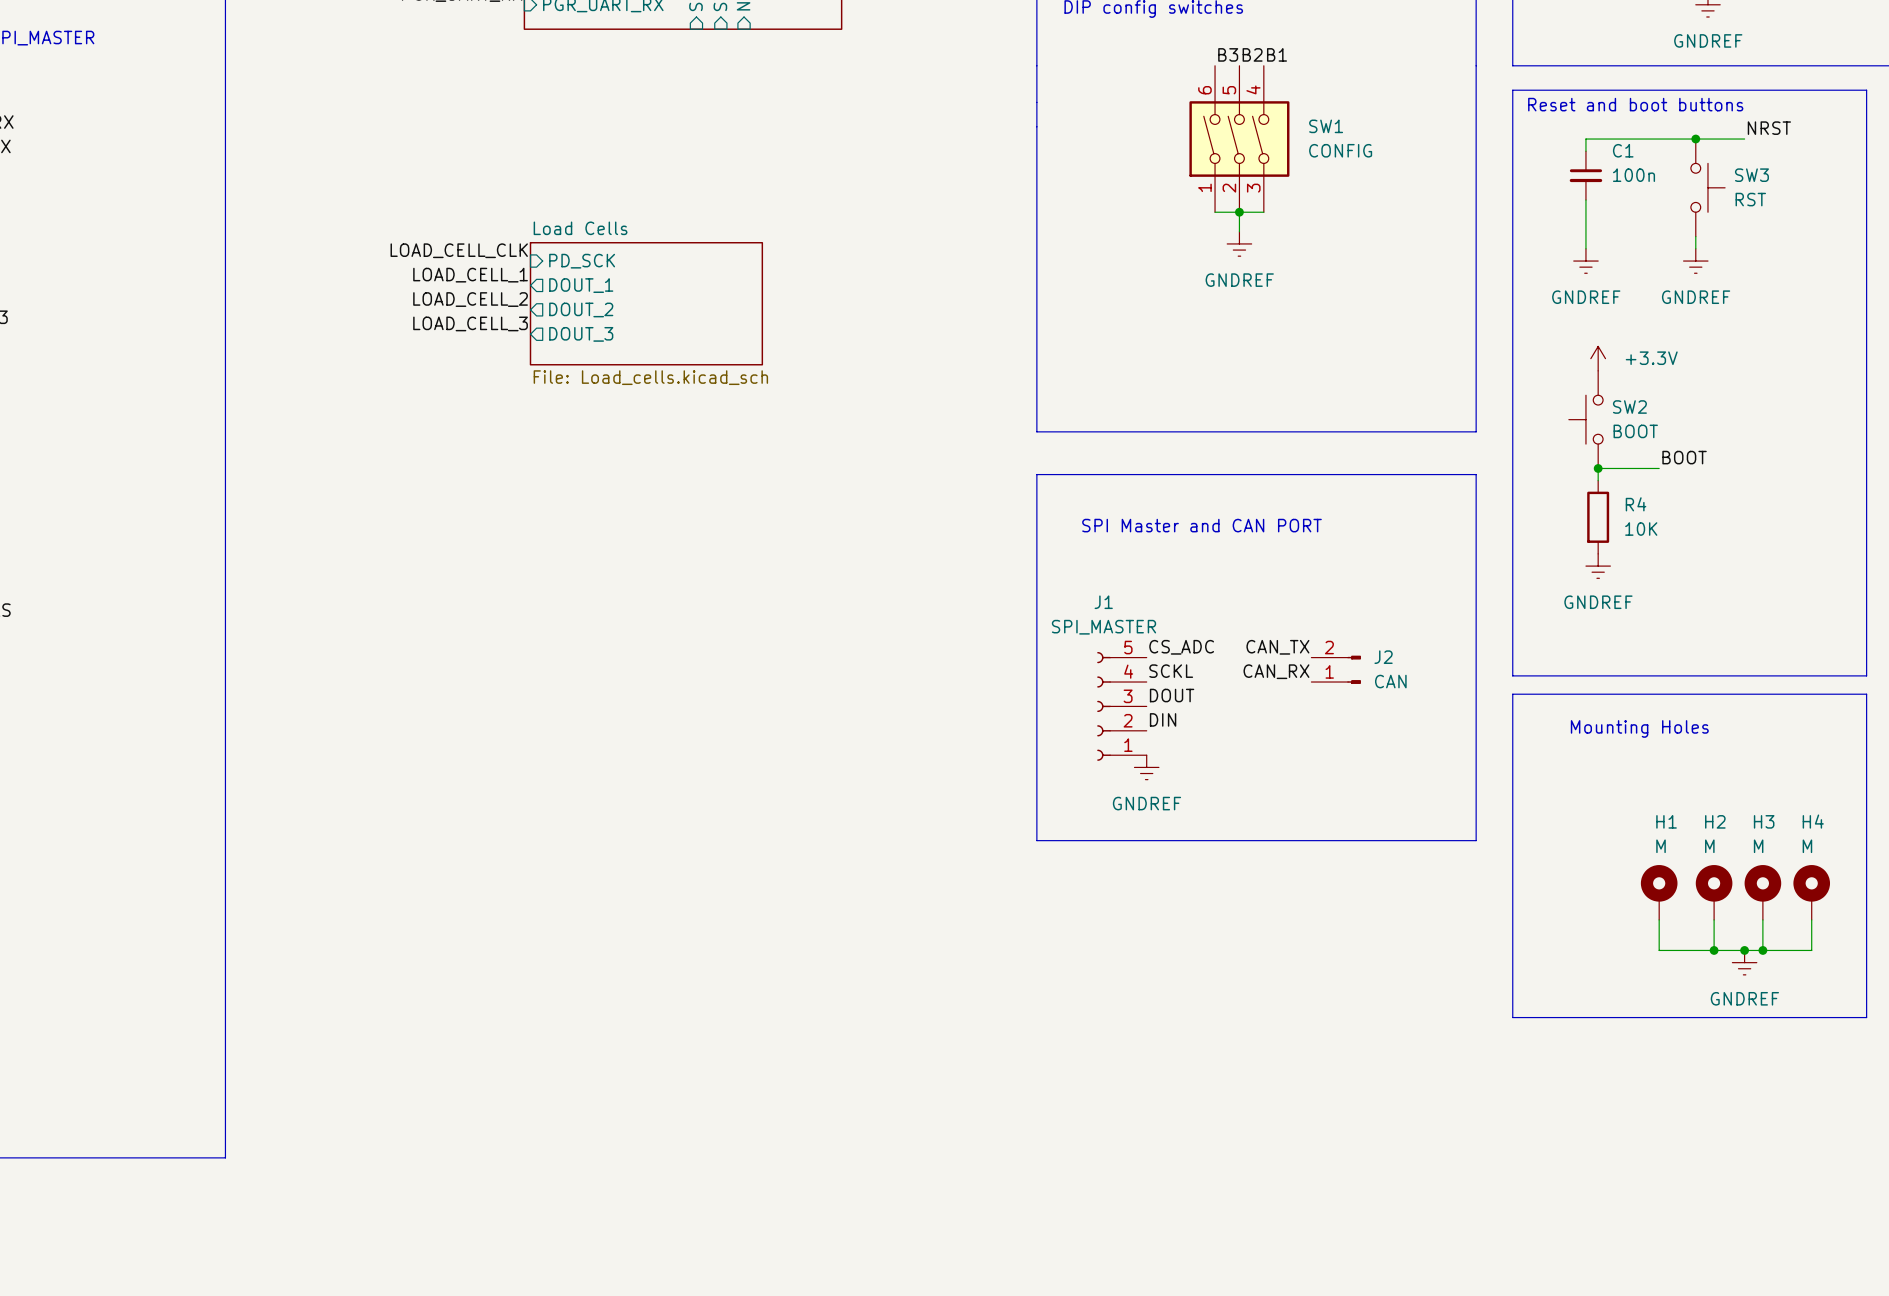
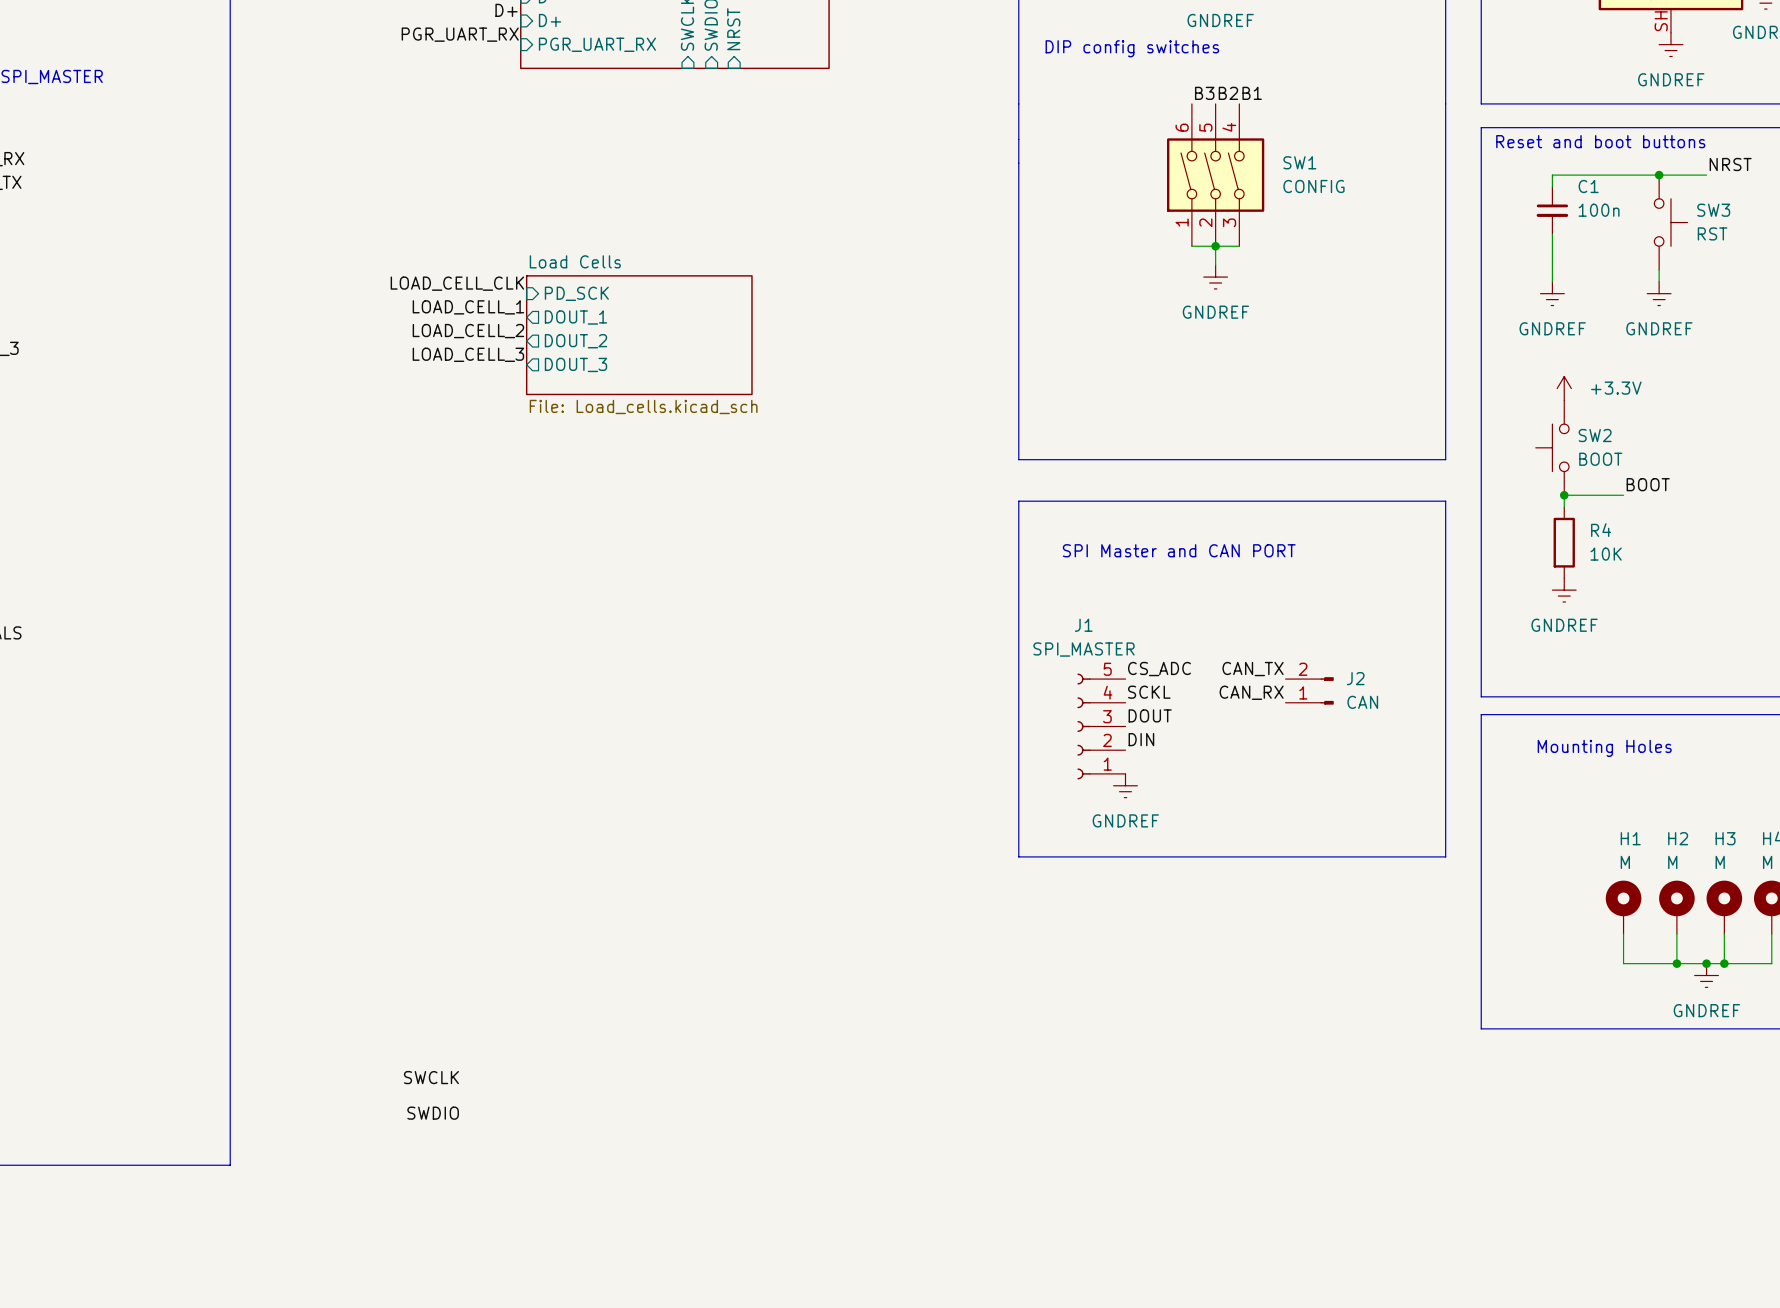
label: none -> SWCLK (431, 1077)
label: none -> SWDIO (433, 1113)

